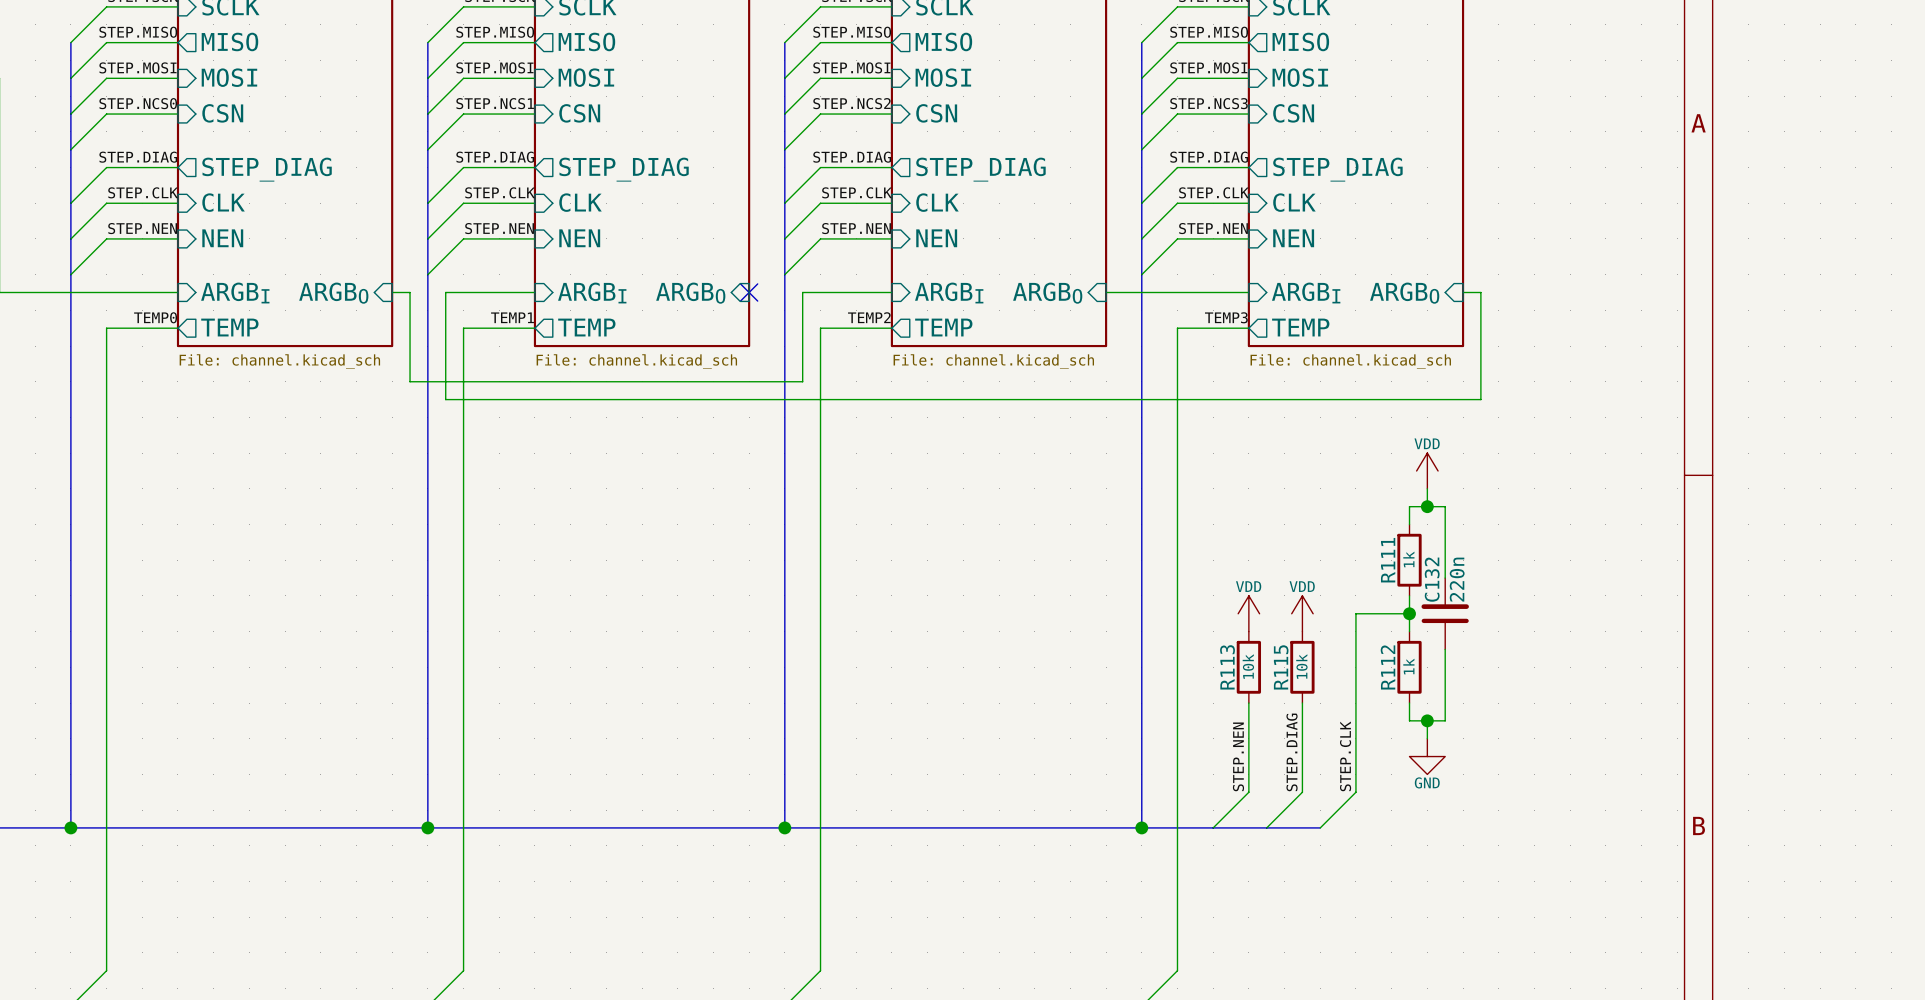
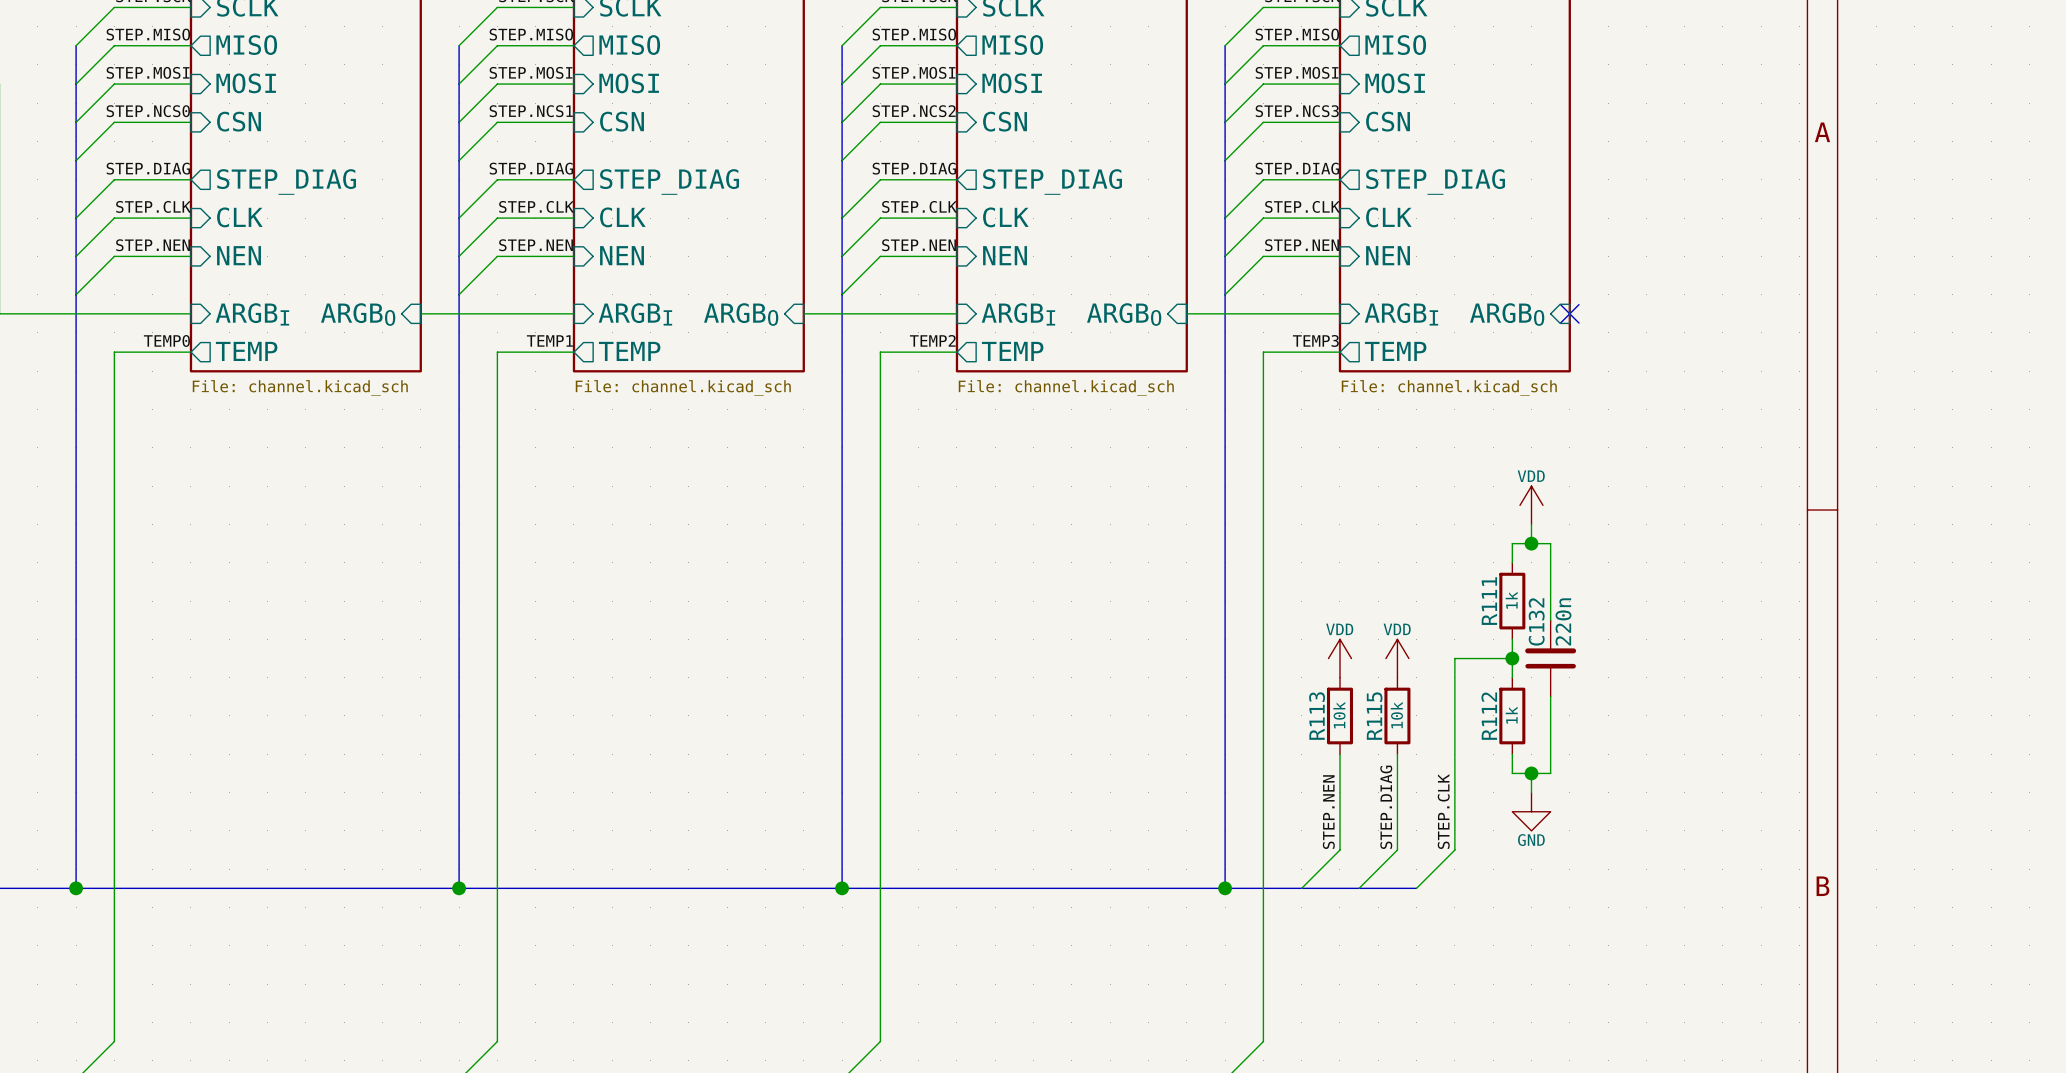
wire: (410, 292) (410, 381) (802, 381) (802, 292) -> (803, 313) (861, 313)
wire: (445, 292) (445, 399) (1480, 399) (1480, 292) (1463, 292) -> (478, 313) (439, 313)
no-connect mark: (749, 292) -> none
no-connect mark: none -> (1569, 313)

